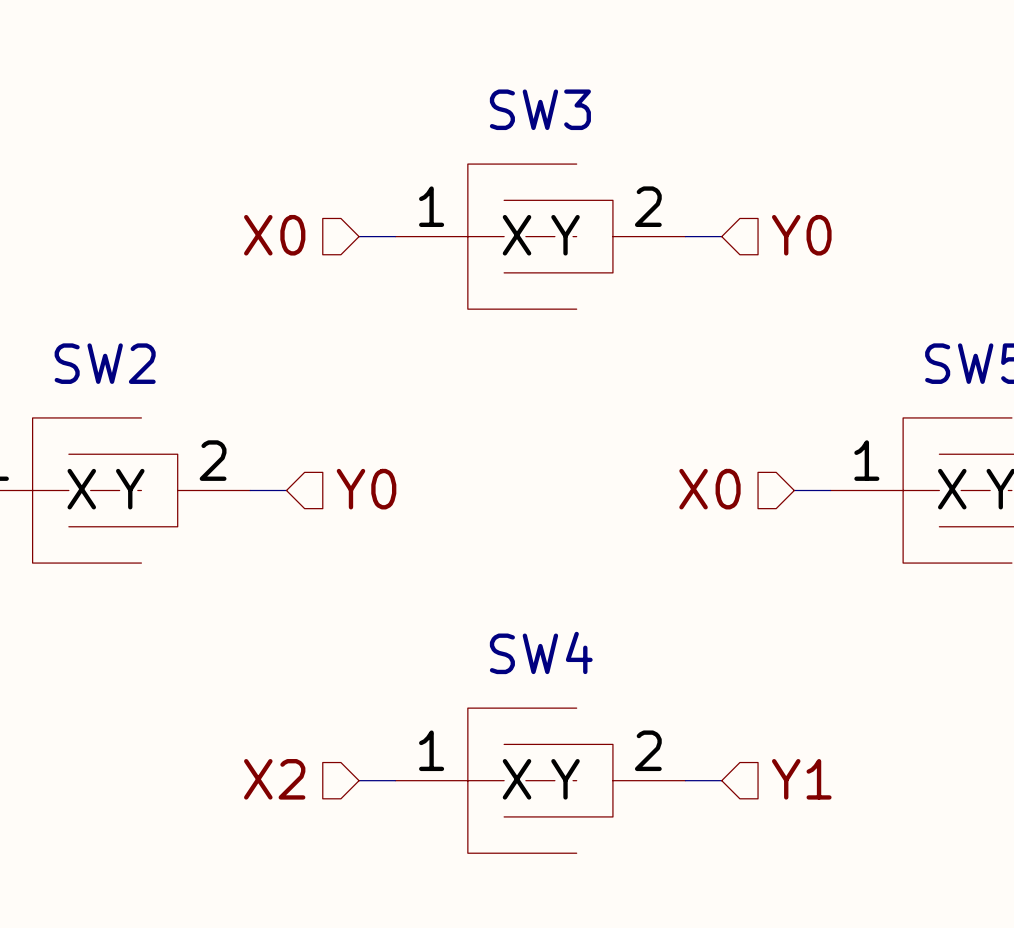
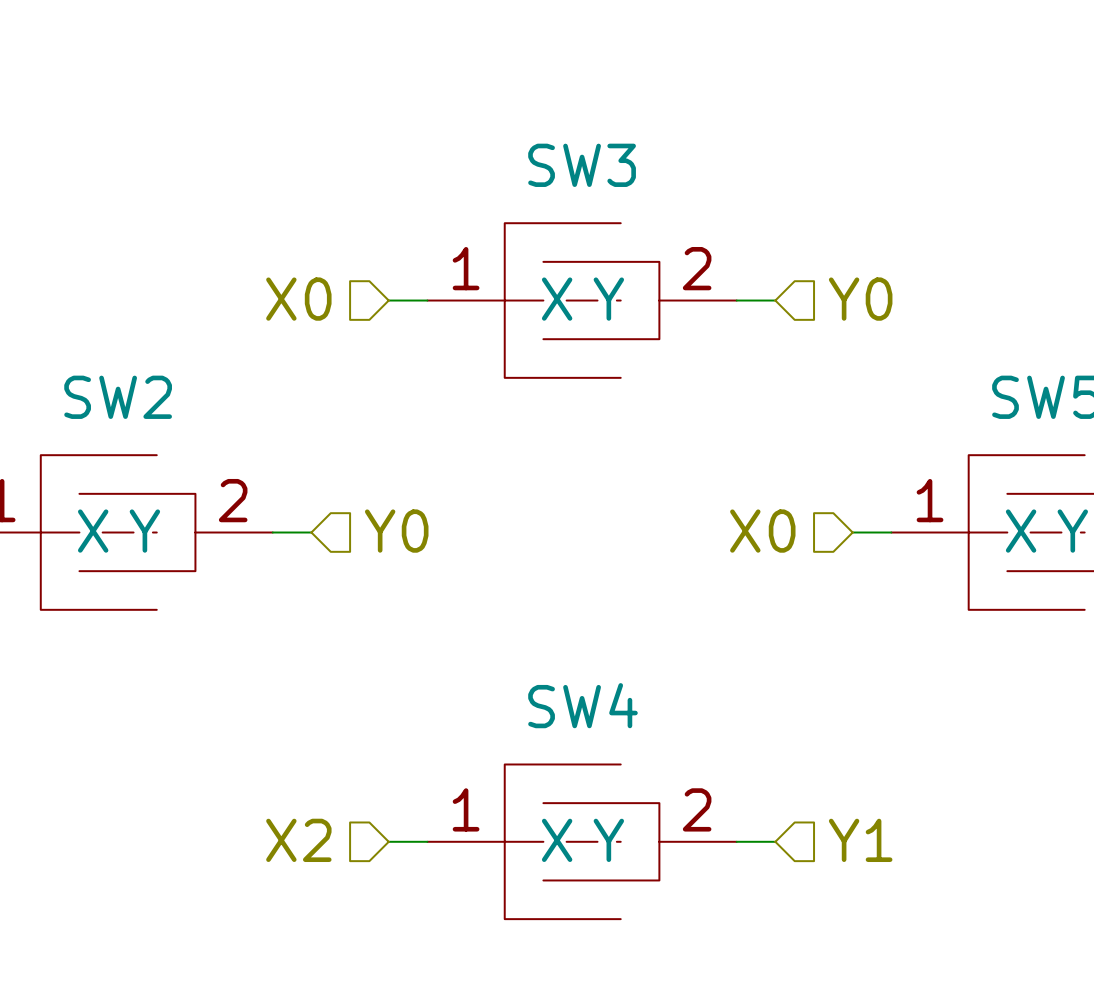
hierarchical label position: X0 (274, 235) -> X0 (298, 299)
hierarchical label position: Y0 (801, 235) -> Y0 (860, 299)
wire: (359, 236) (395, 236) -> (388, 300) (427, 300)
SW3 position: (540, 236) -> (582, 300)
wire: (685, 236) (721, 236) -> (736, 300) (775, 300)

